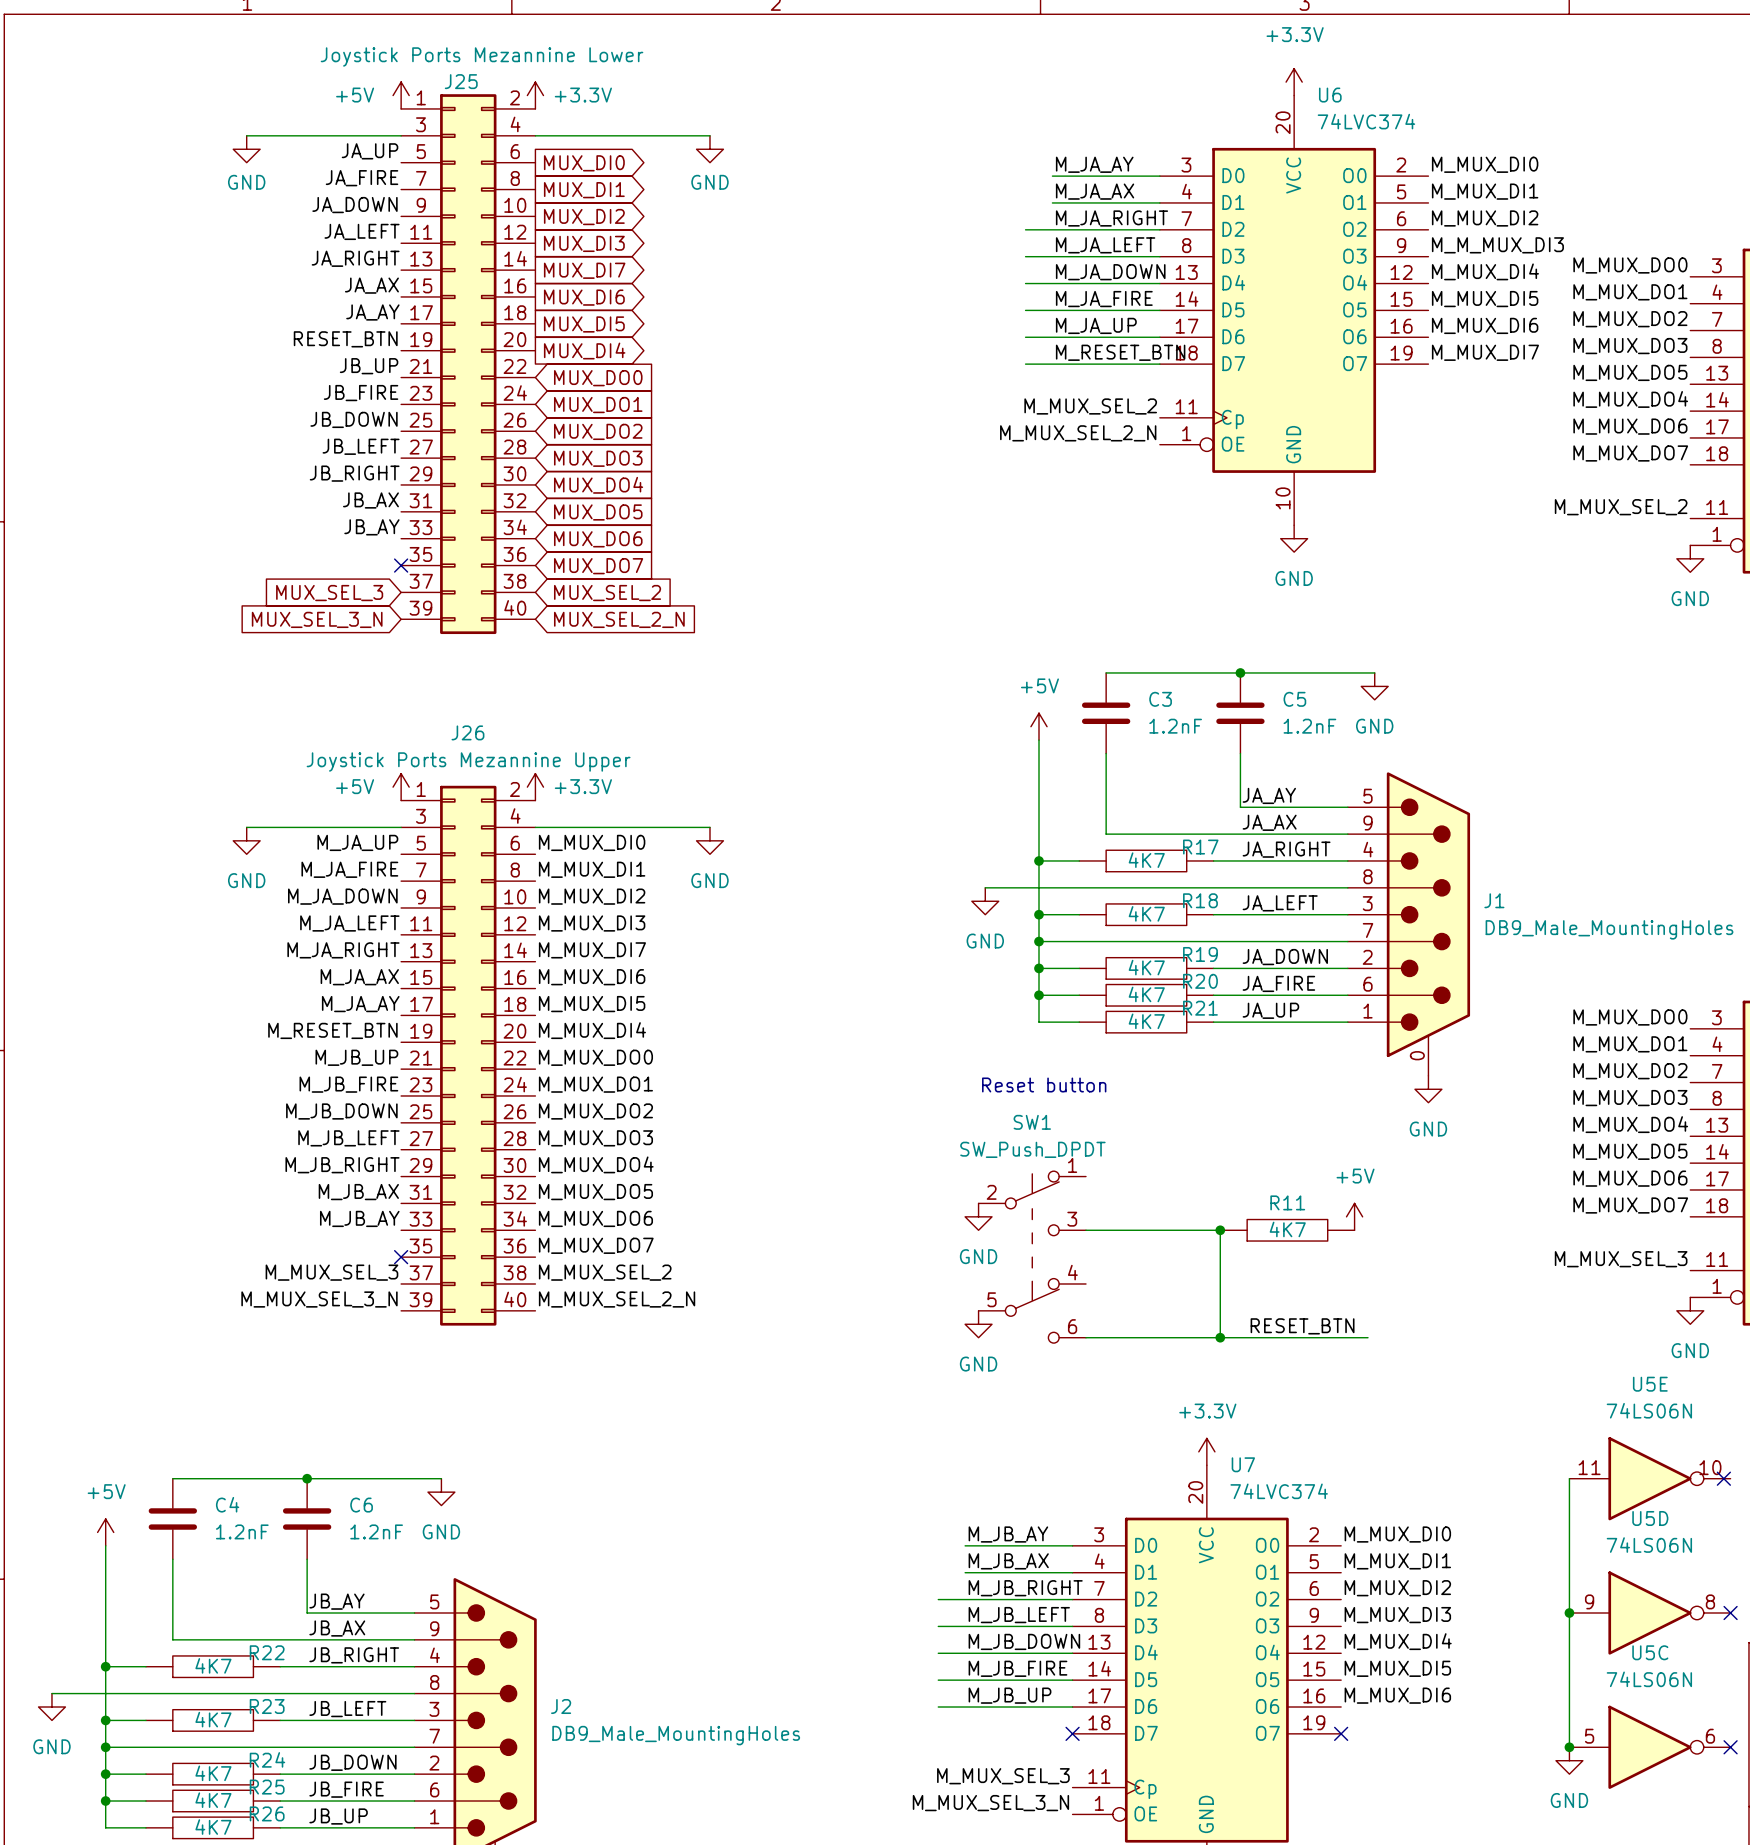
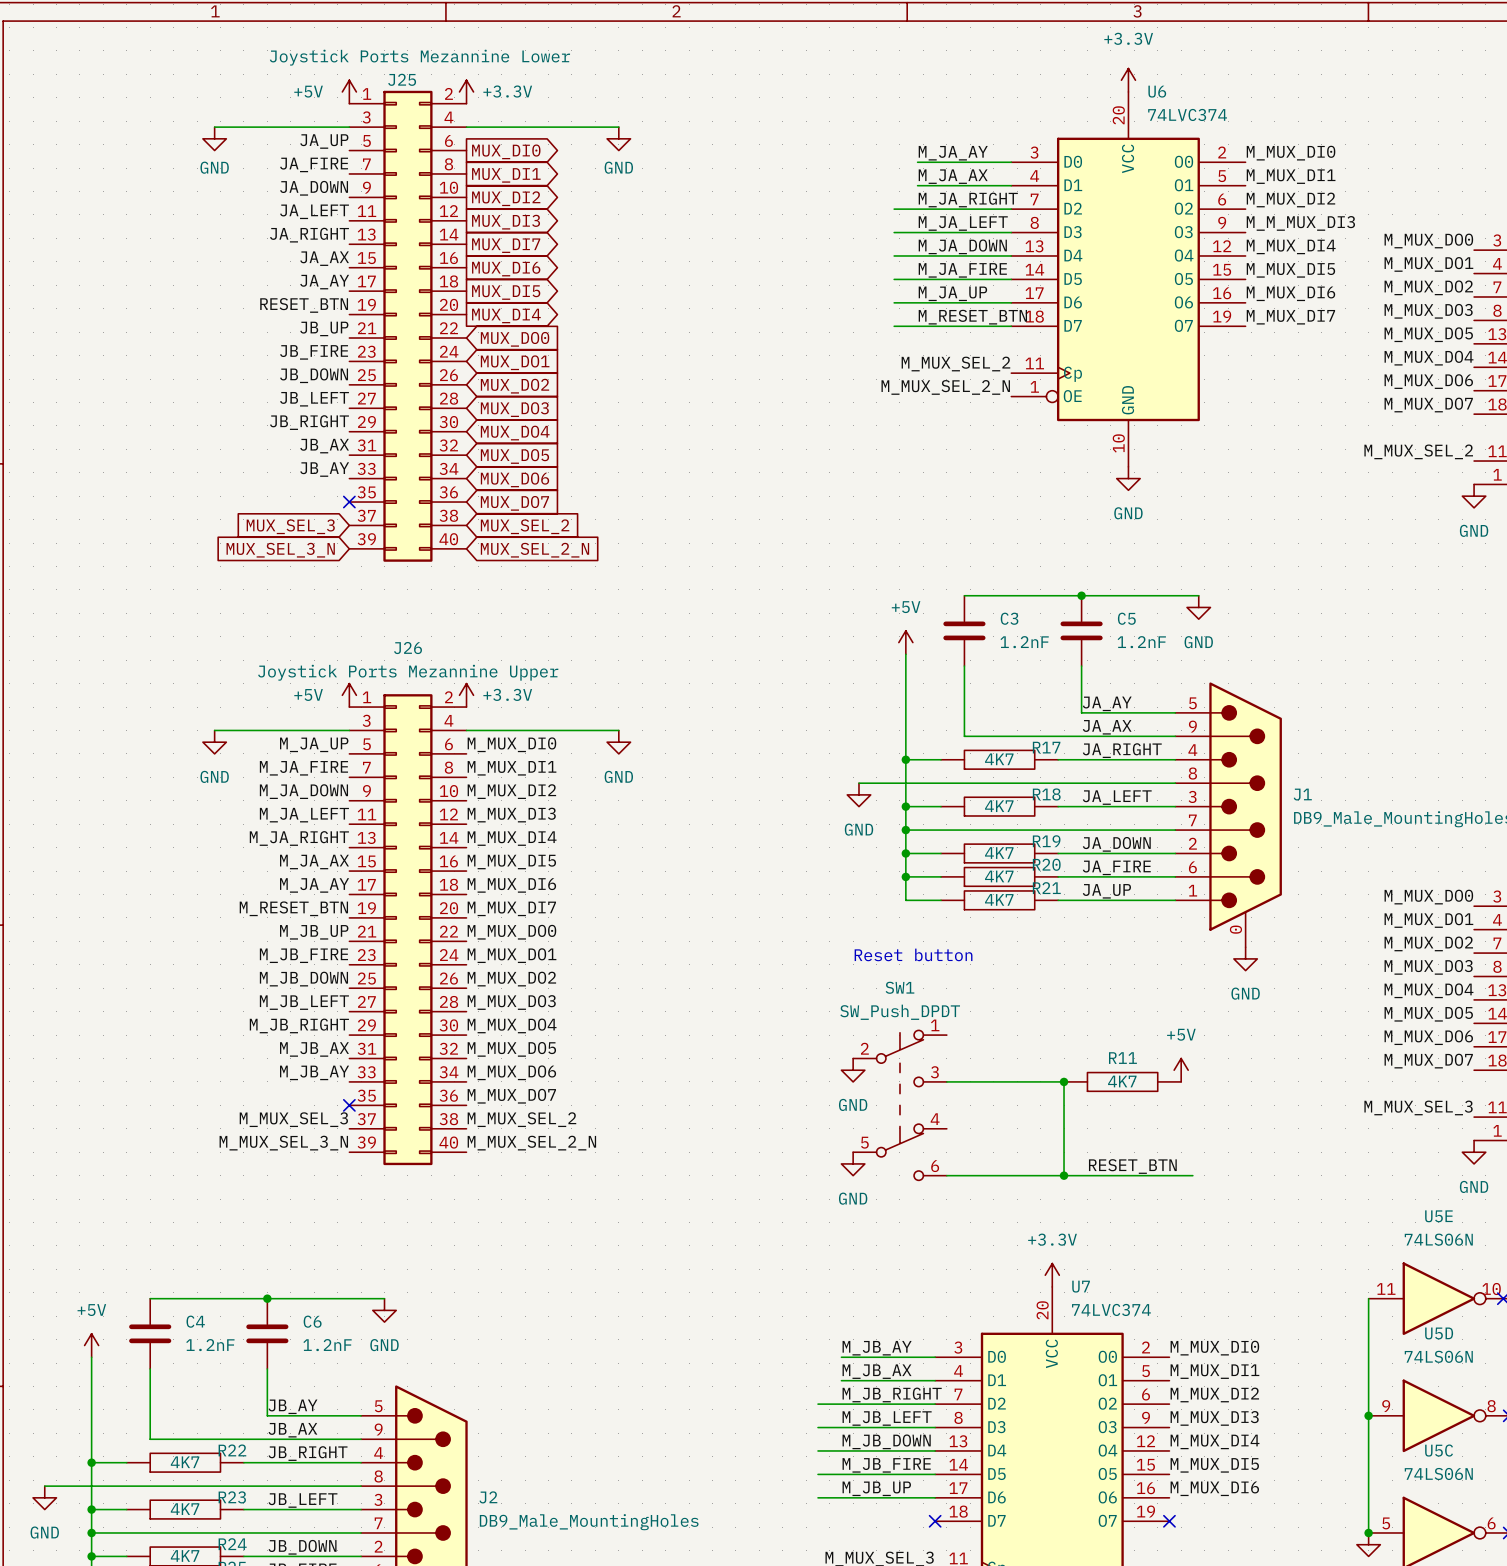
label: M_MUX_DI7 (592, 950) -> M_MUX_DI4 (512, 838)
label: M_MUX_DI6 (592, 977) -> M_MUX_DI5 (511, 862)
label: M_MUX_DI5 (592, 1004) -> M_MUX_DI6 (511, 885)
label: M_MUX_DI4 (592, 1030) -> M_MUX_DI7 (511, 908)

